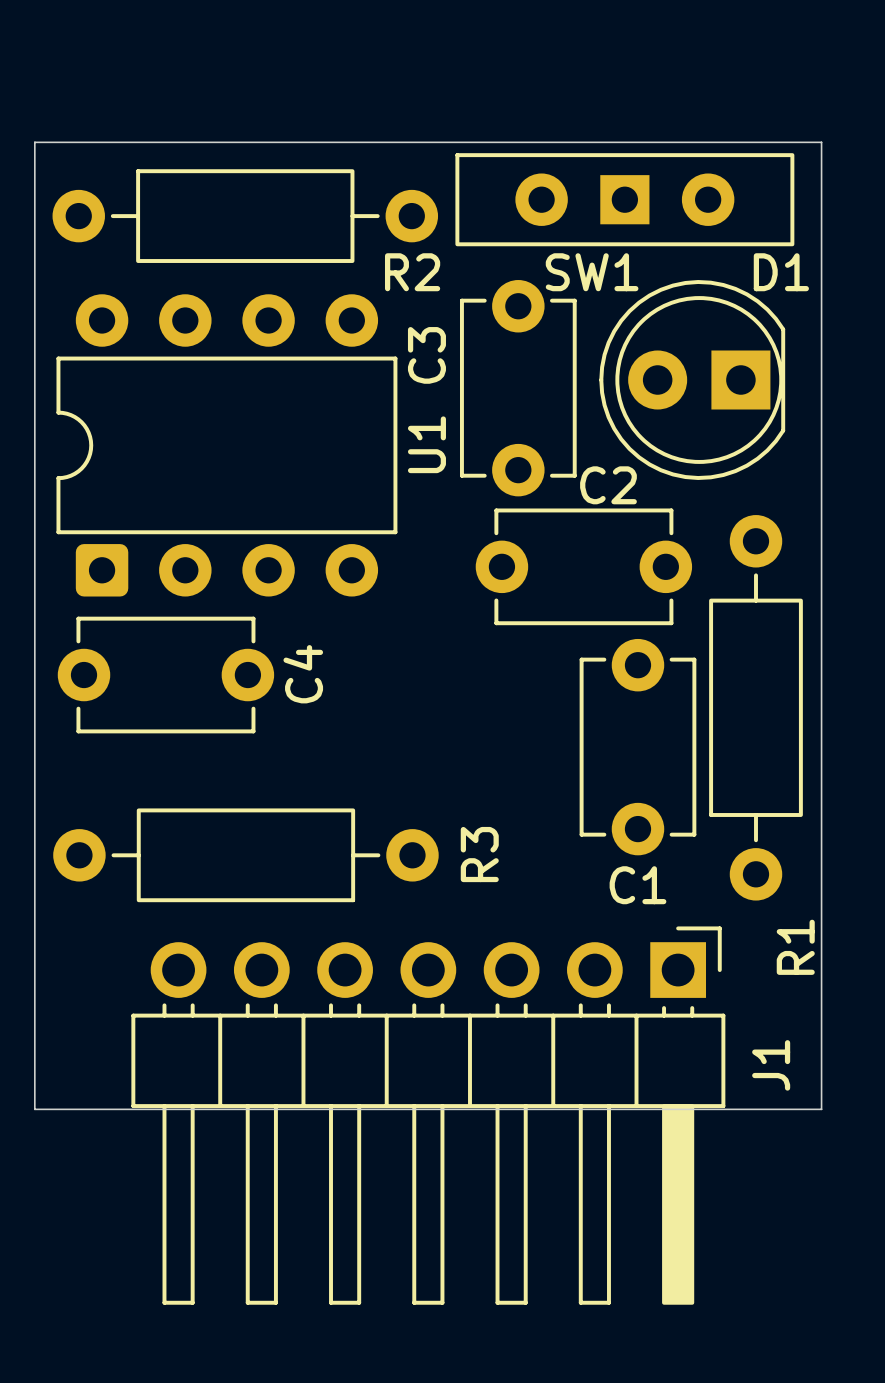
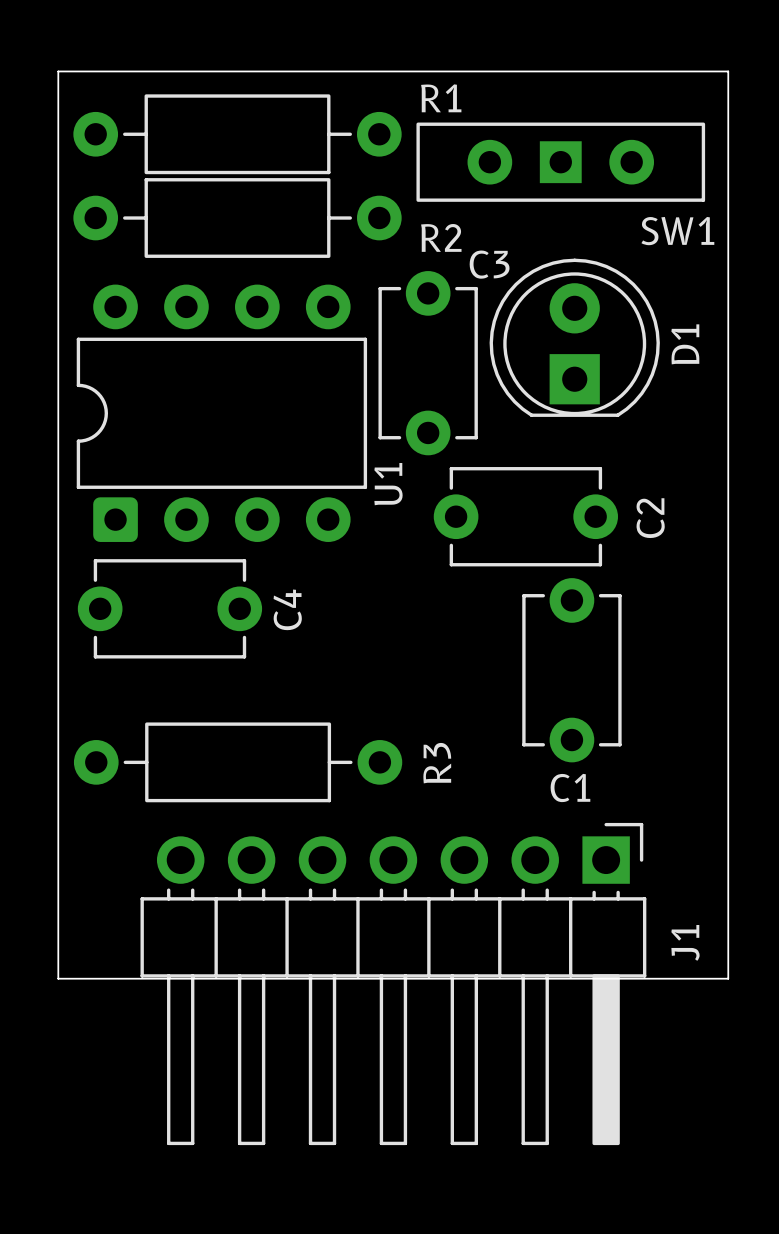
board edge: (34, 142) (821, 142) -> (58, 155) (58, 71) (728, 71) (728, 155)
SW1 position: (624, 199) -> (560, 162)
R2 name position: R2 (412, 272) -> R2 (441, 237)
SW1 name position: SW1 (592, 272) -> SW1 (677, 231)
D1 name position: D1 (781, 272) -> D1 (685, 344)
C3 name rotation: 0° (426, 355) -> 90° clockwise (489, 264)
C3 name position: C3 (426, 355) -> C3 (489, 264)
D1 rotation: 0° (692, 380) -> 90° clockwise (574, 337)
C3 position: (518, 388) -> (428, 363)
U1 name position: U1 (426, 444) -> U1 (388, 484)
C2 name rotation: 0° (608, 485) -> 90° counterclockwise (650, 518)
C2 name position: C2 (608, 485) -> C2 (650, 518)
R1 rotation: 0° (755, 707) -> 90° clockwise (237, 134)
R1 position: (755, 707) -> (237, 134)
R1 name position: R1 (795, 947) -> R1 (441, 98)

